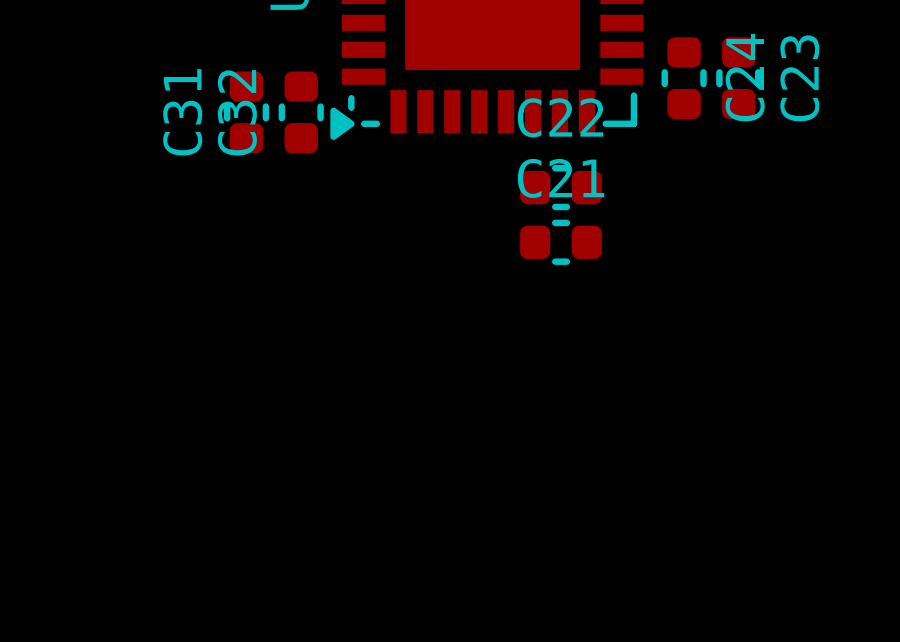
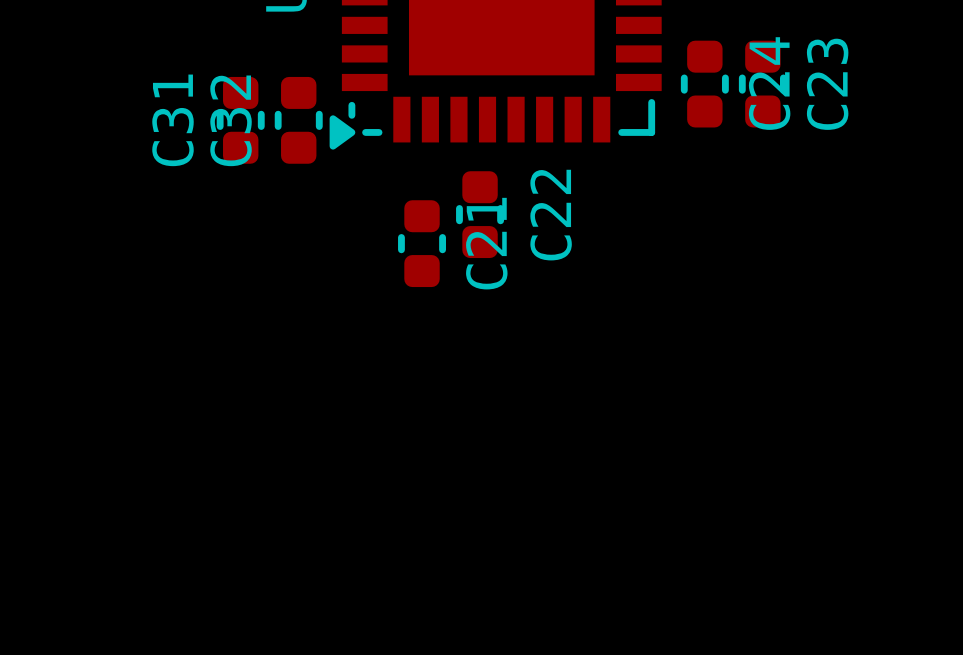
C22 rotation: 0° (561, 187) -> 90° clockwise (480, 214)
C22 position: (561, 187) -> (480, 214)
C21 rotation: 0° (561, 242) -> 90° clockwise (422, 243)
C21 position: (561, 242) -> (422, 243)

